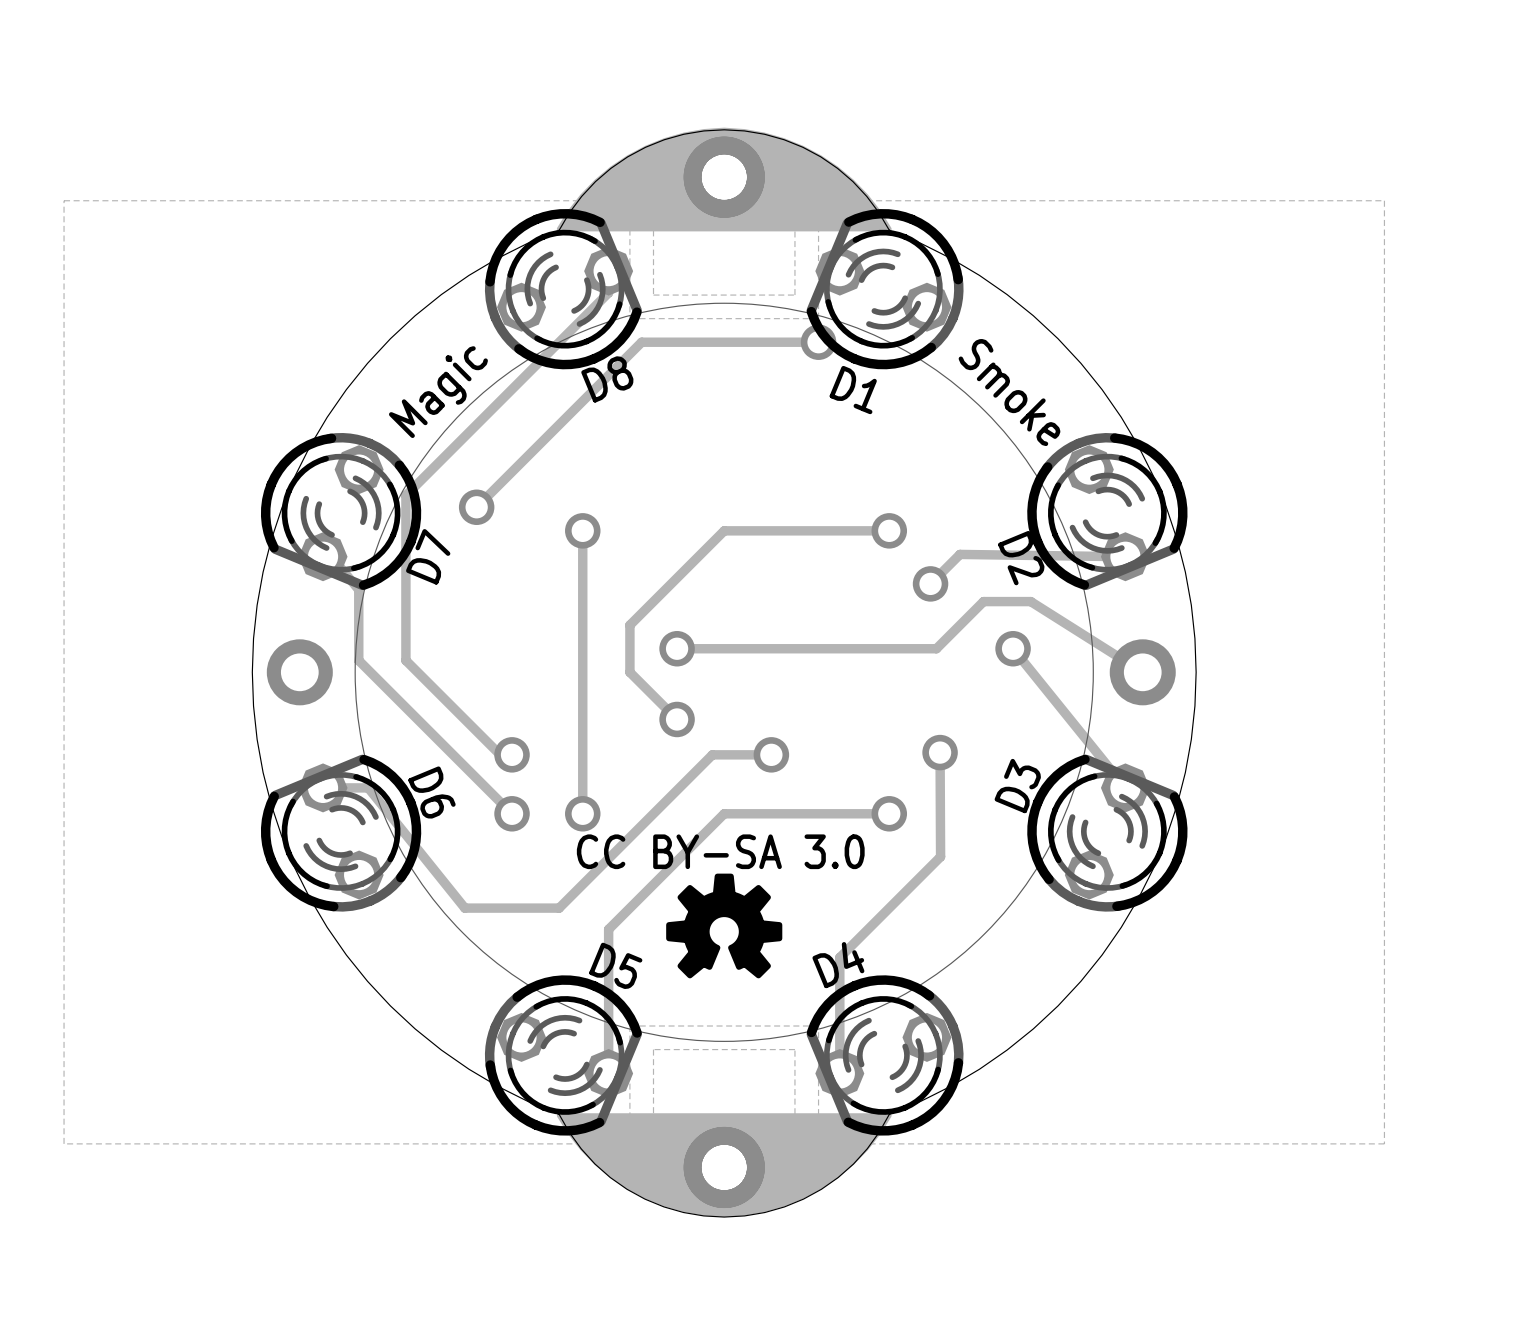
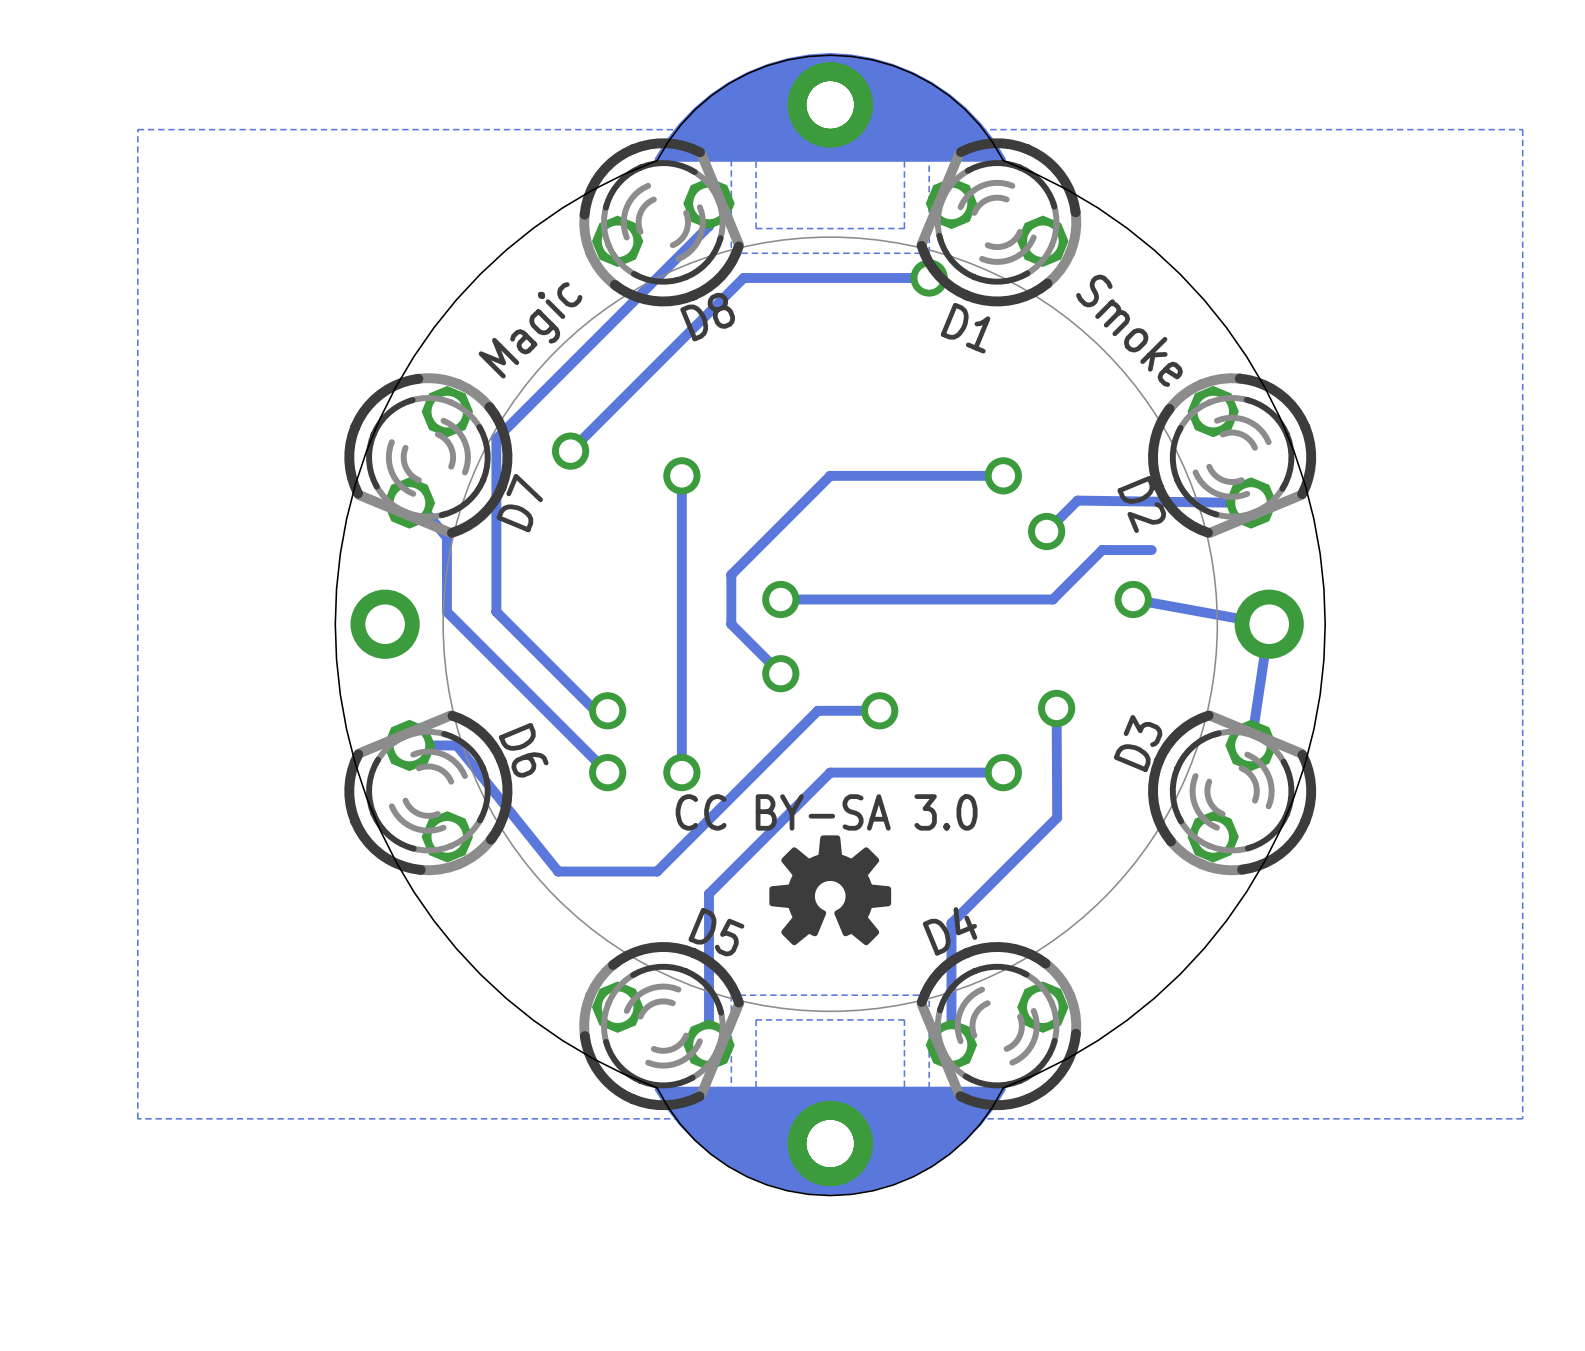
track: (1030, 601) (1142, 672) -> none
track: (1013, 648) (1125, 787) -> (1133, 599) (1269, 624) (1251, 745)

